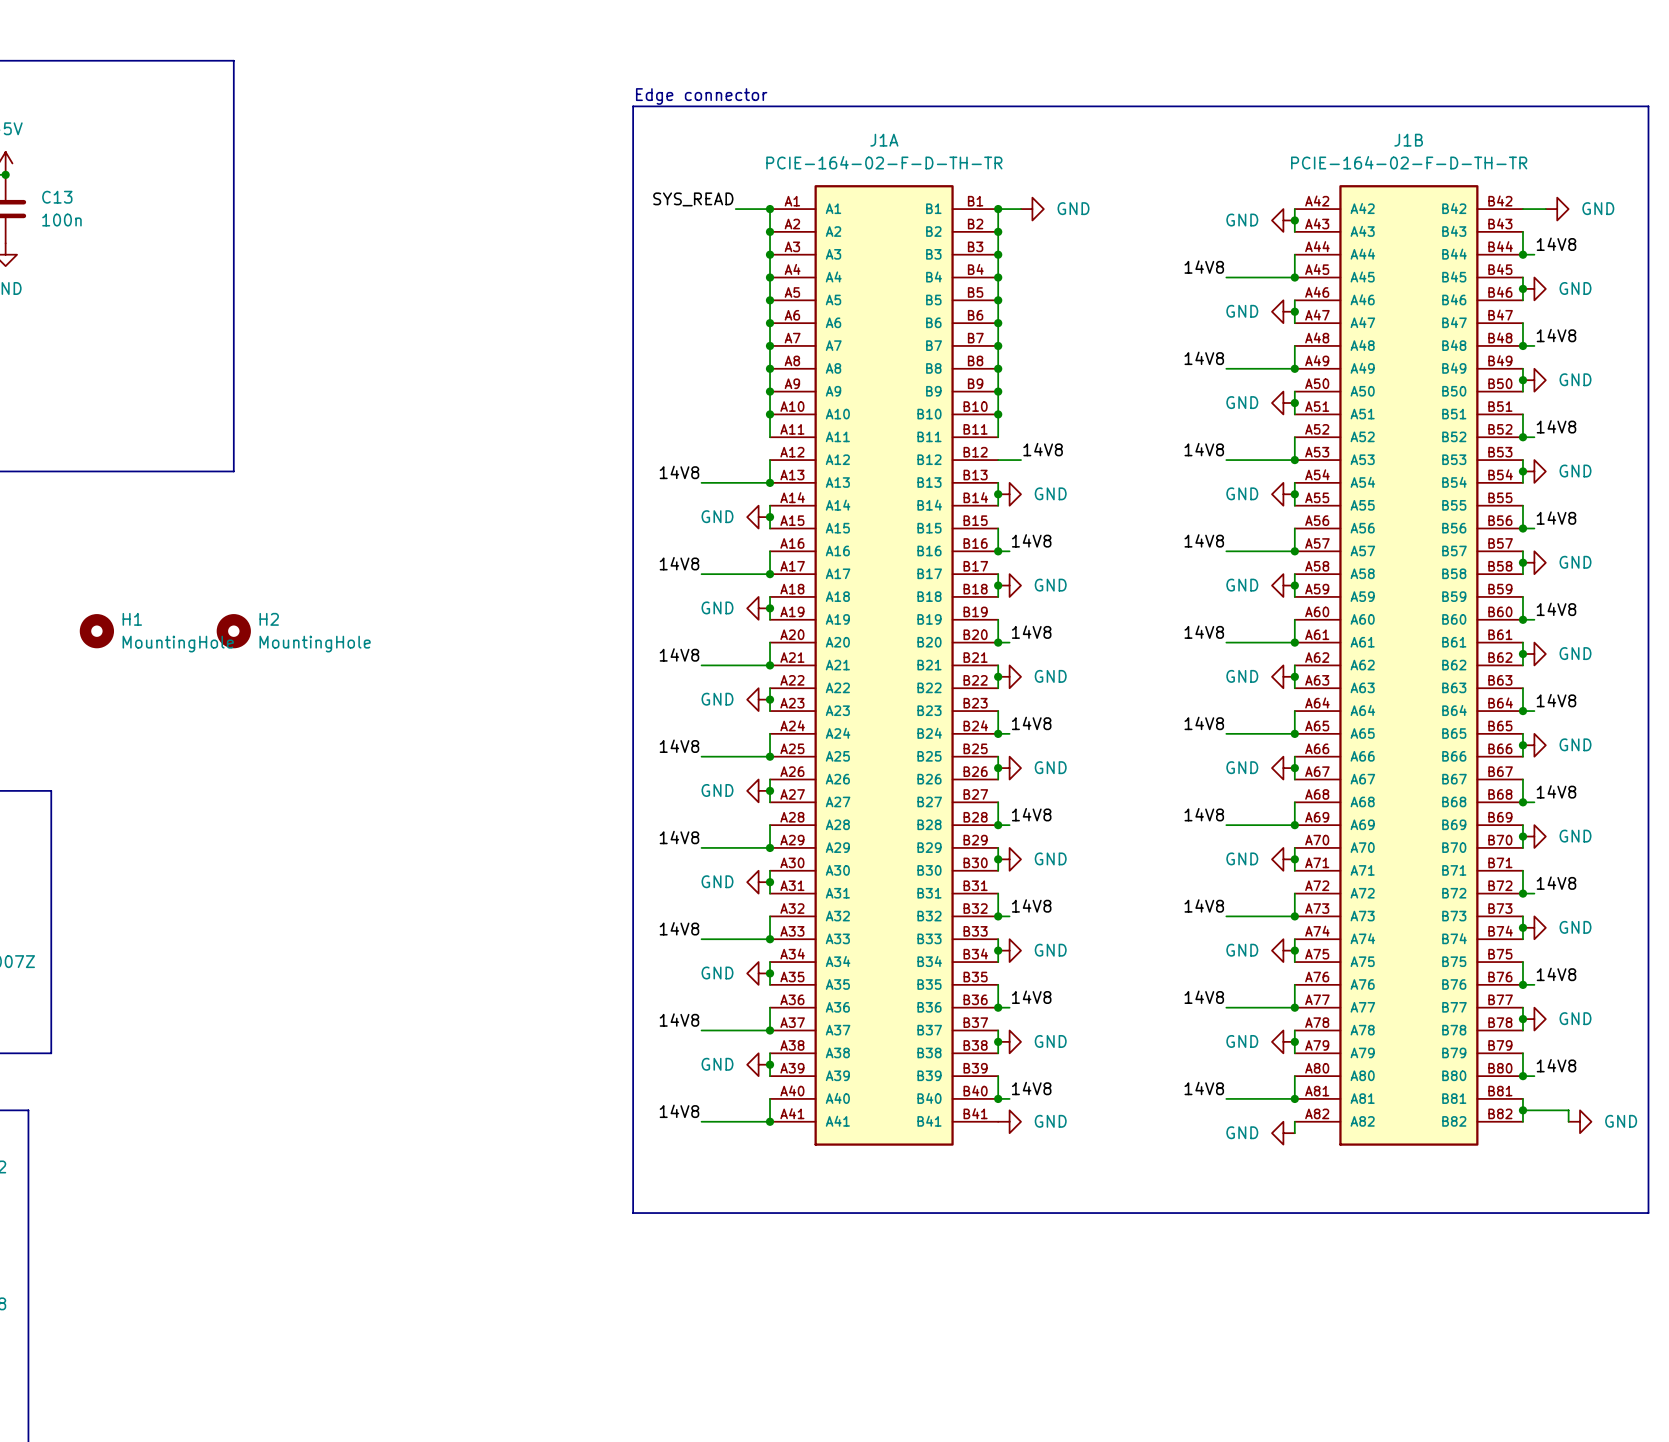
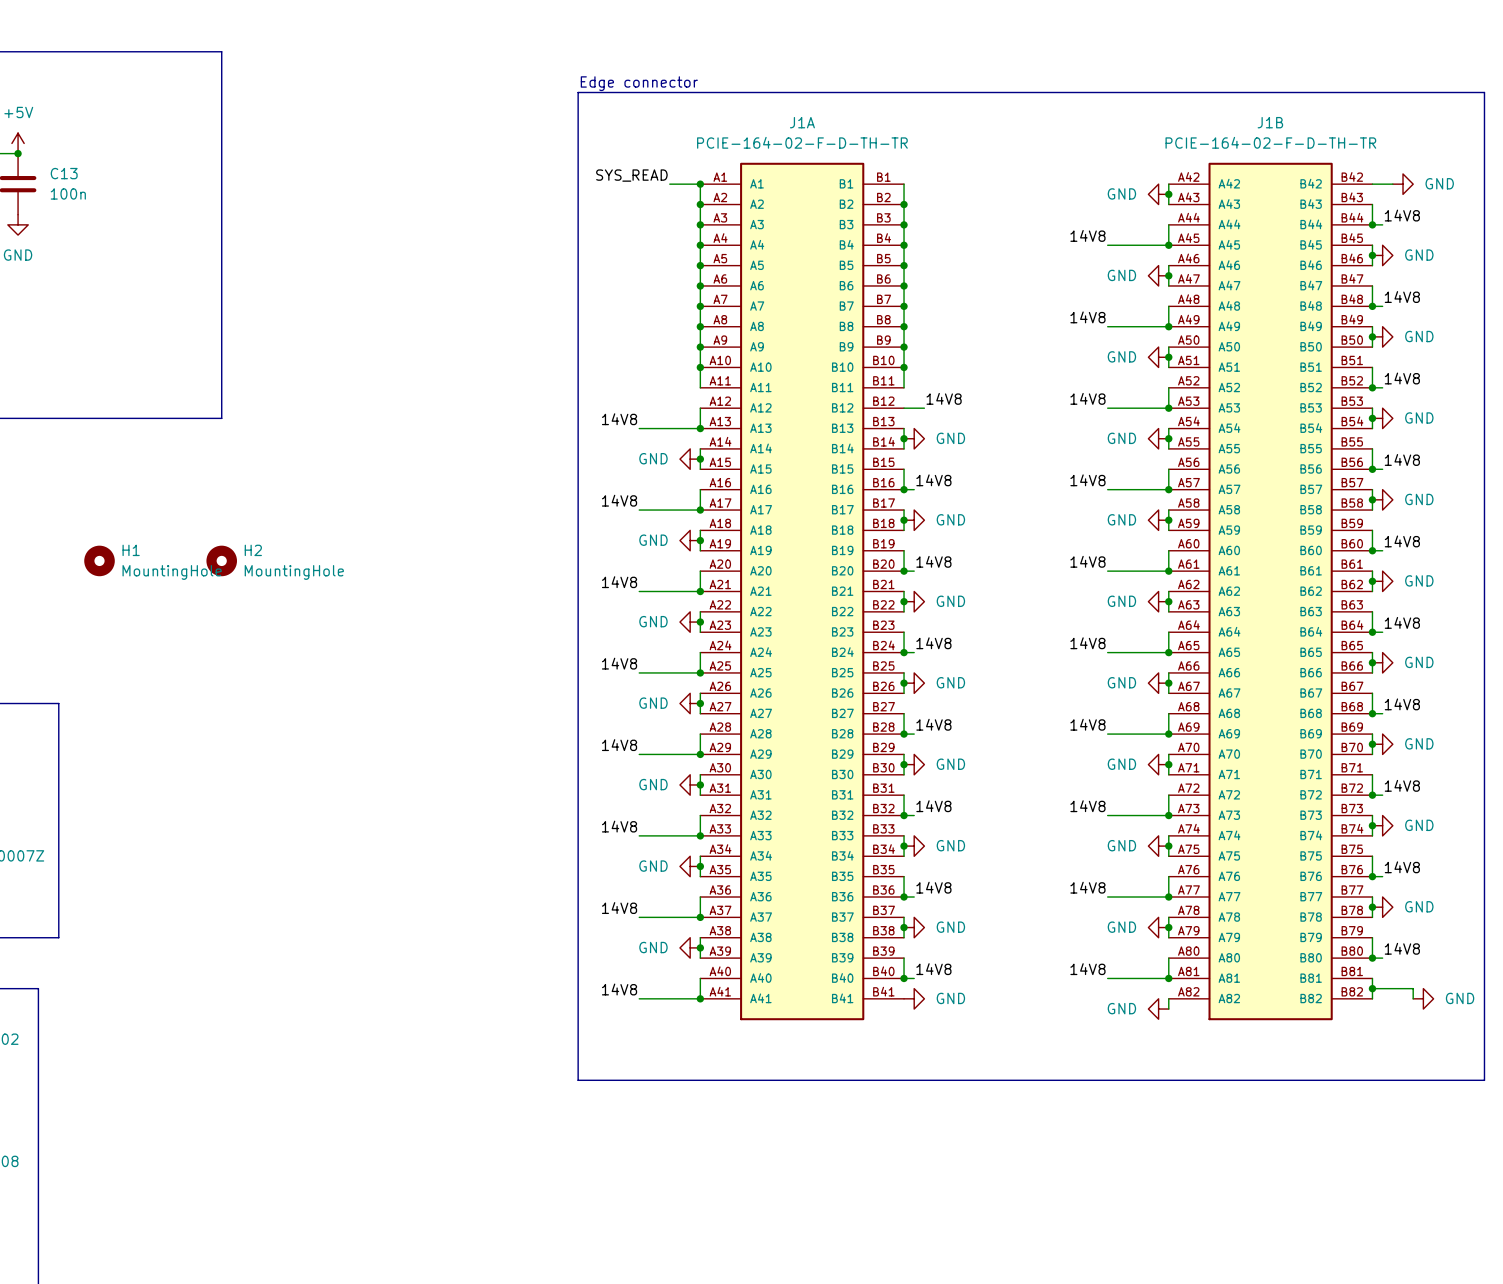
wire: (998, 209) (1021, 209) -> none
junction: (998, 209) -> none
power symbol: GND (1032, 209) -> none

